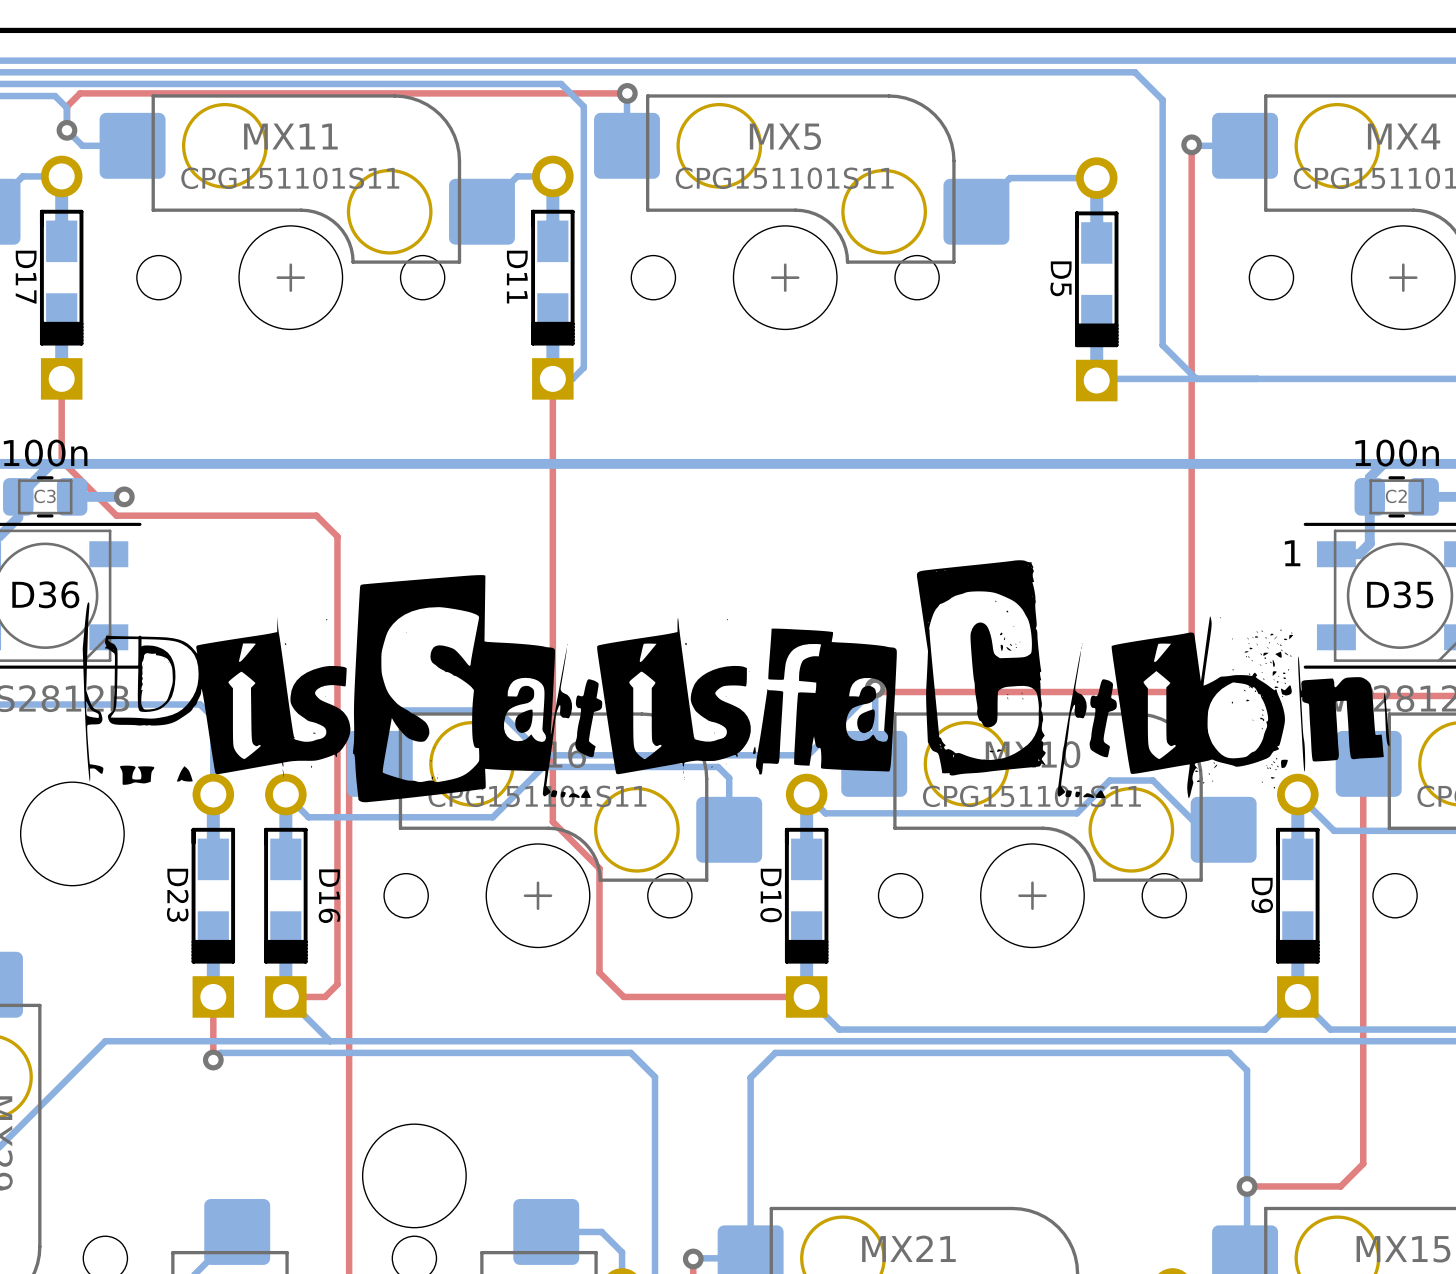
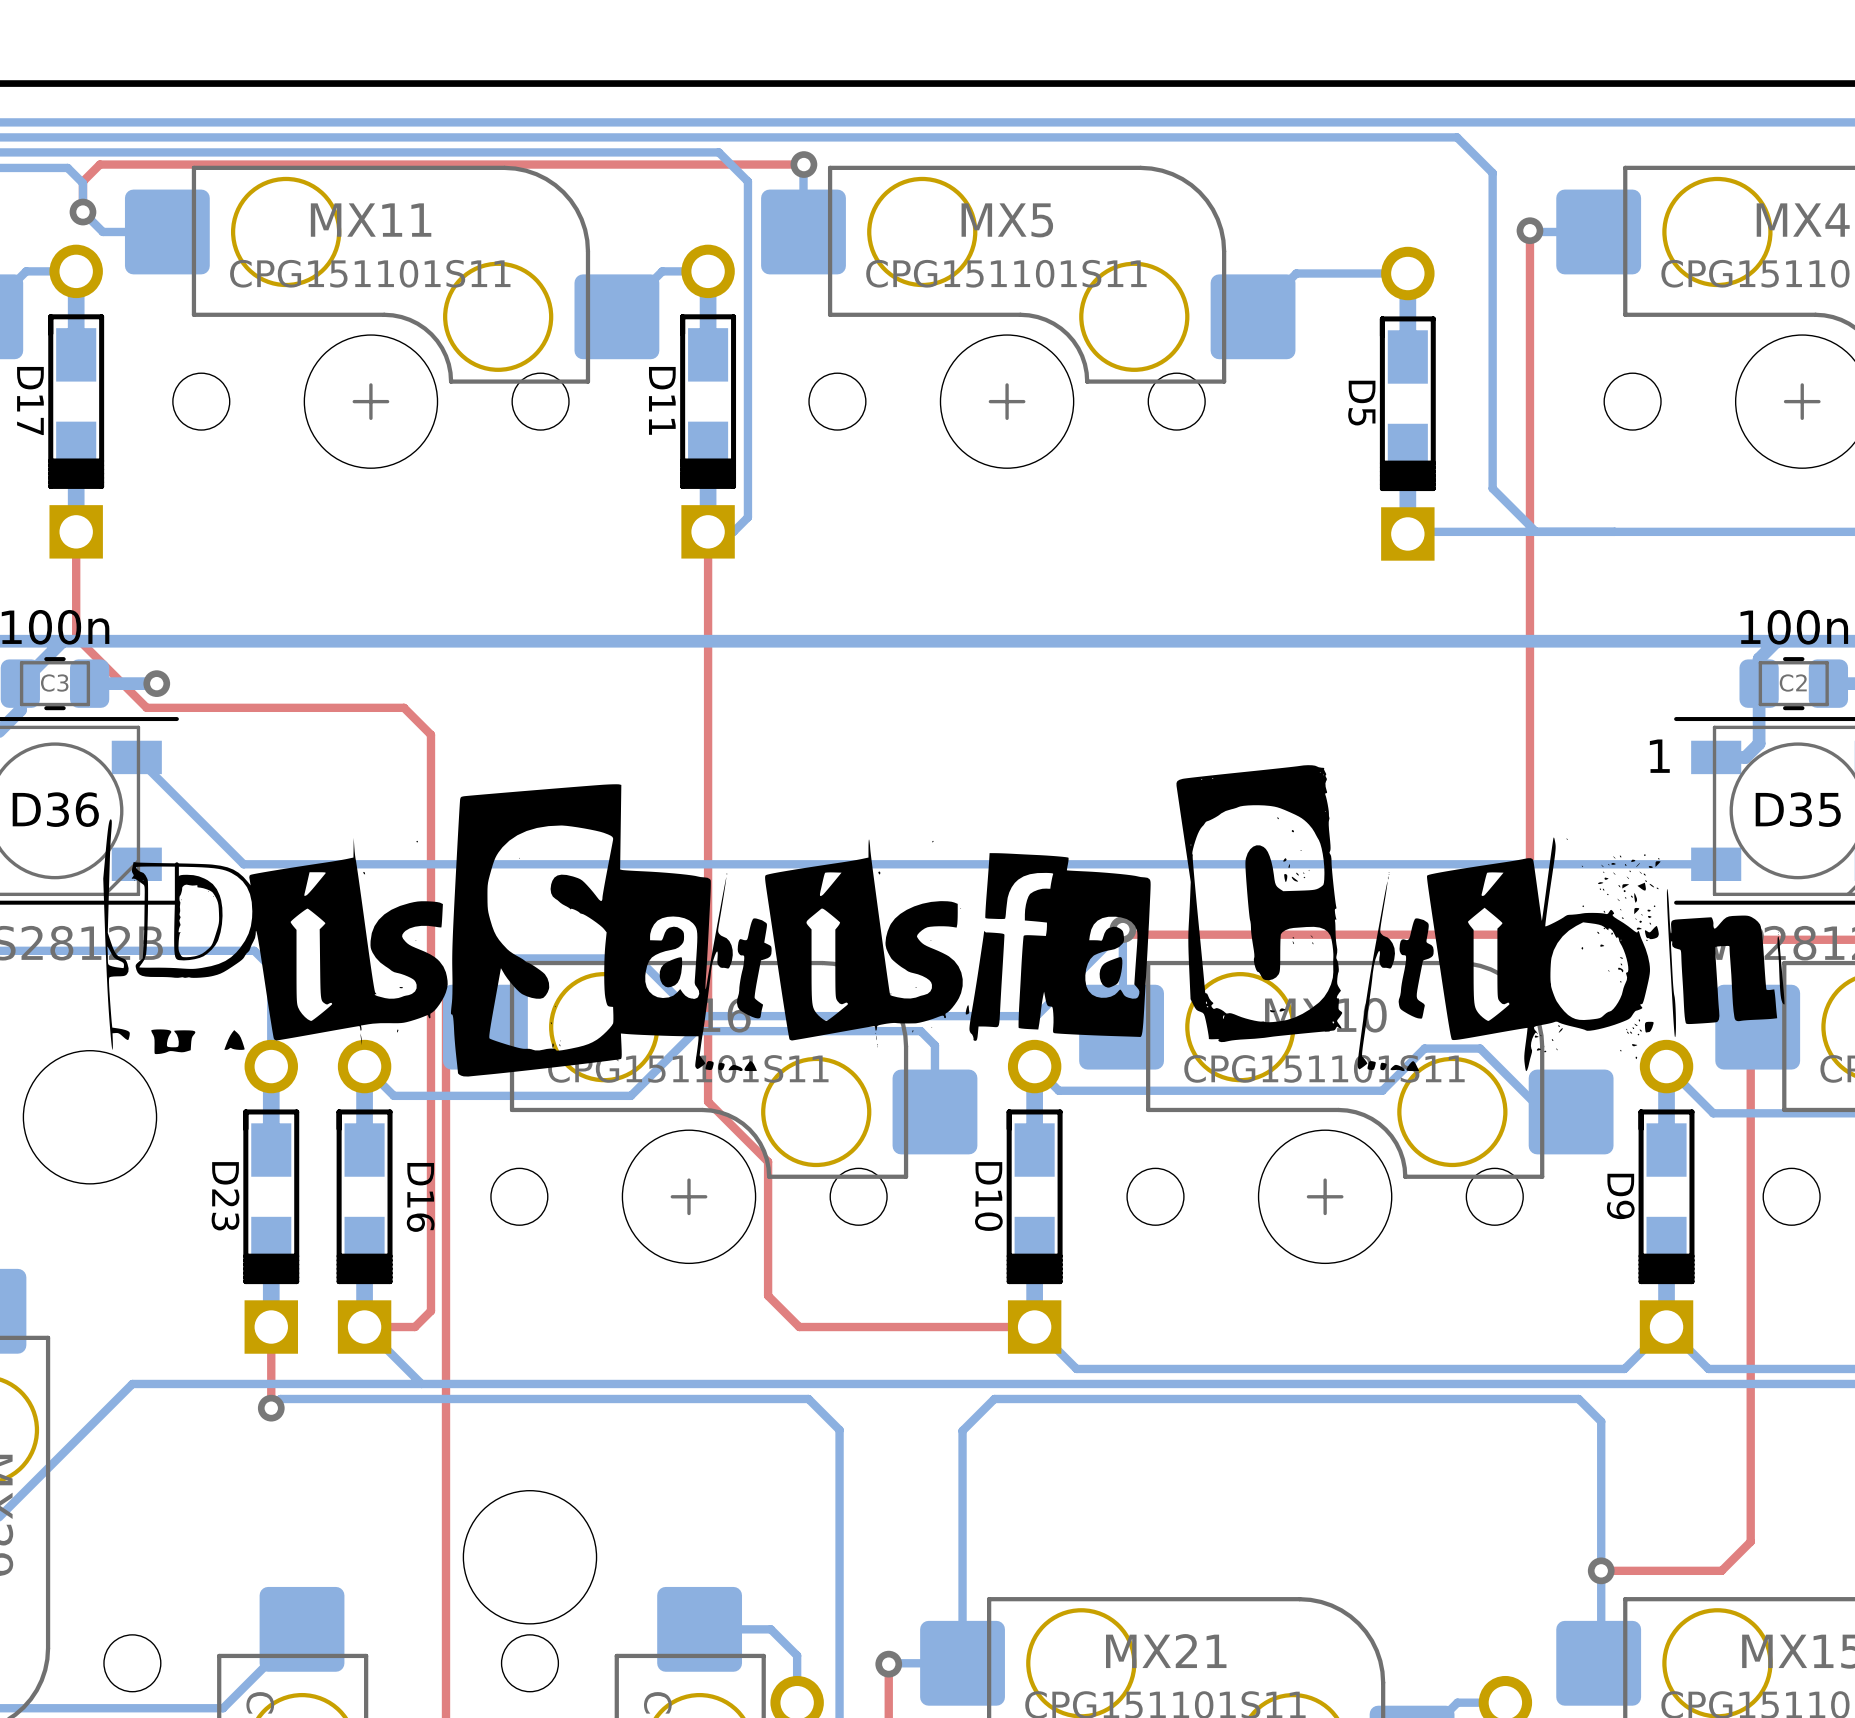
bottom track: none -> (136, 757) (243, 864) (1716, 864)

